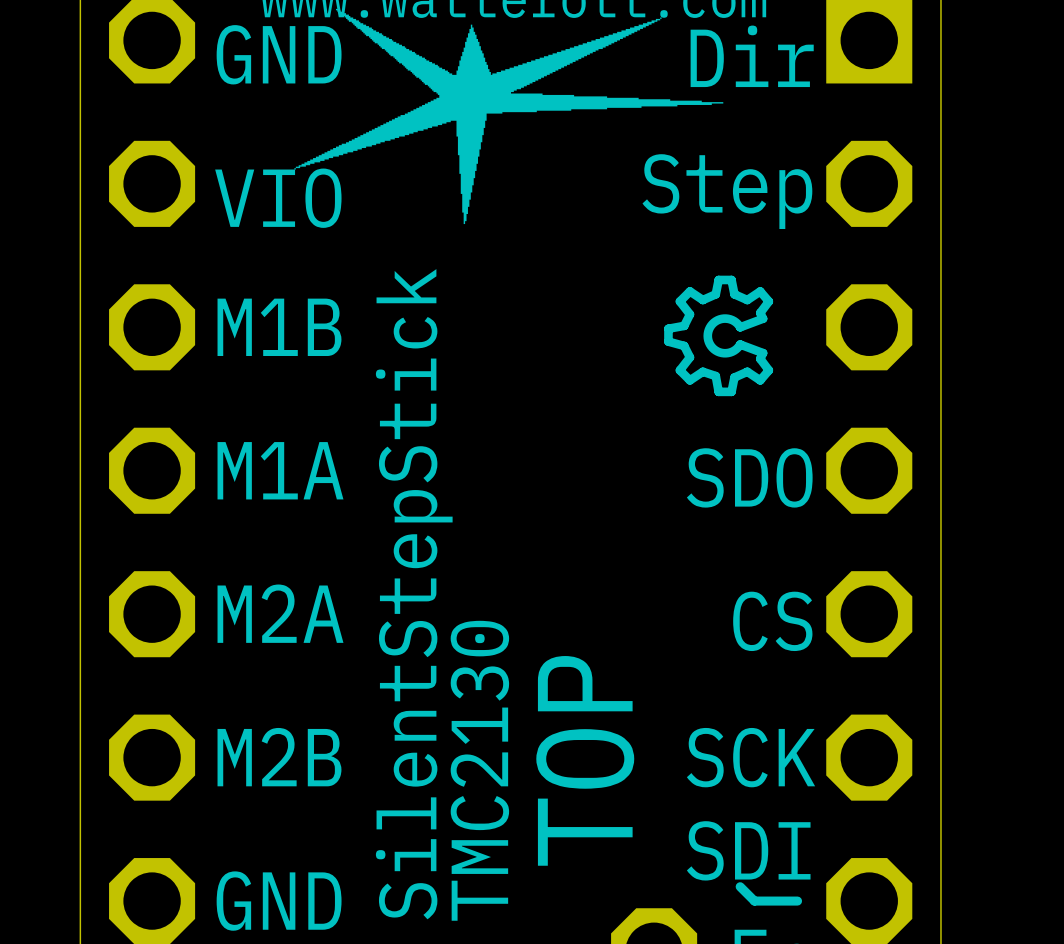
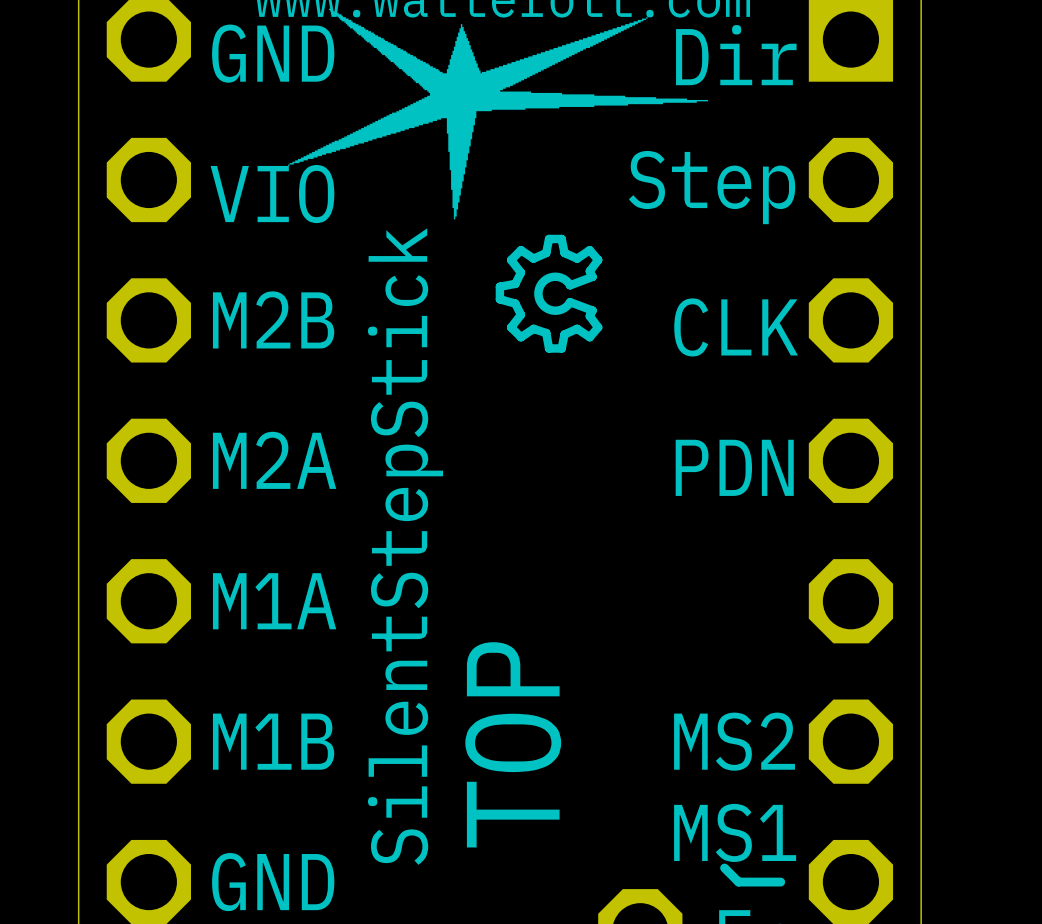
text: M1B (279, 327) -> M2B (273, 319)
text: none -> CLK (736, 327)
drawing position: (718, 335) -> (549, 293)
text: M1A (280, 470) -> M2A (274, 460)
text: SDO (749, 477) -> PDN (734, 467)
text position: SilentStepStick (414, 594) -> SilentStepStick (405, 546)
text: M2A (280, 613) -> M1A (274, 601)
text: CS (772, 621) -> none
text: M2B (279, 757) -> M1B (273, 741)
text: SCK (751, 757) -> MS2 (734, 741)
text position: TOP (585, 760) -> TOP (513, 744)
text: TMC2130 (479, 770) -> none
text: SDI (748, 850) -> MS1 (735, 832)

